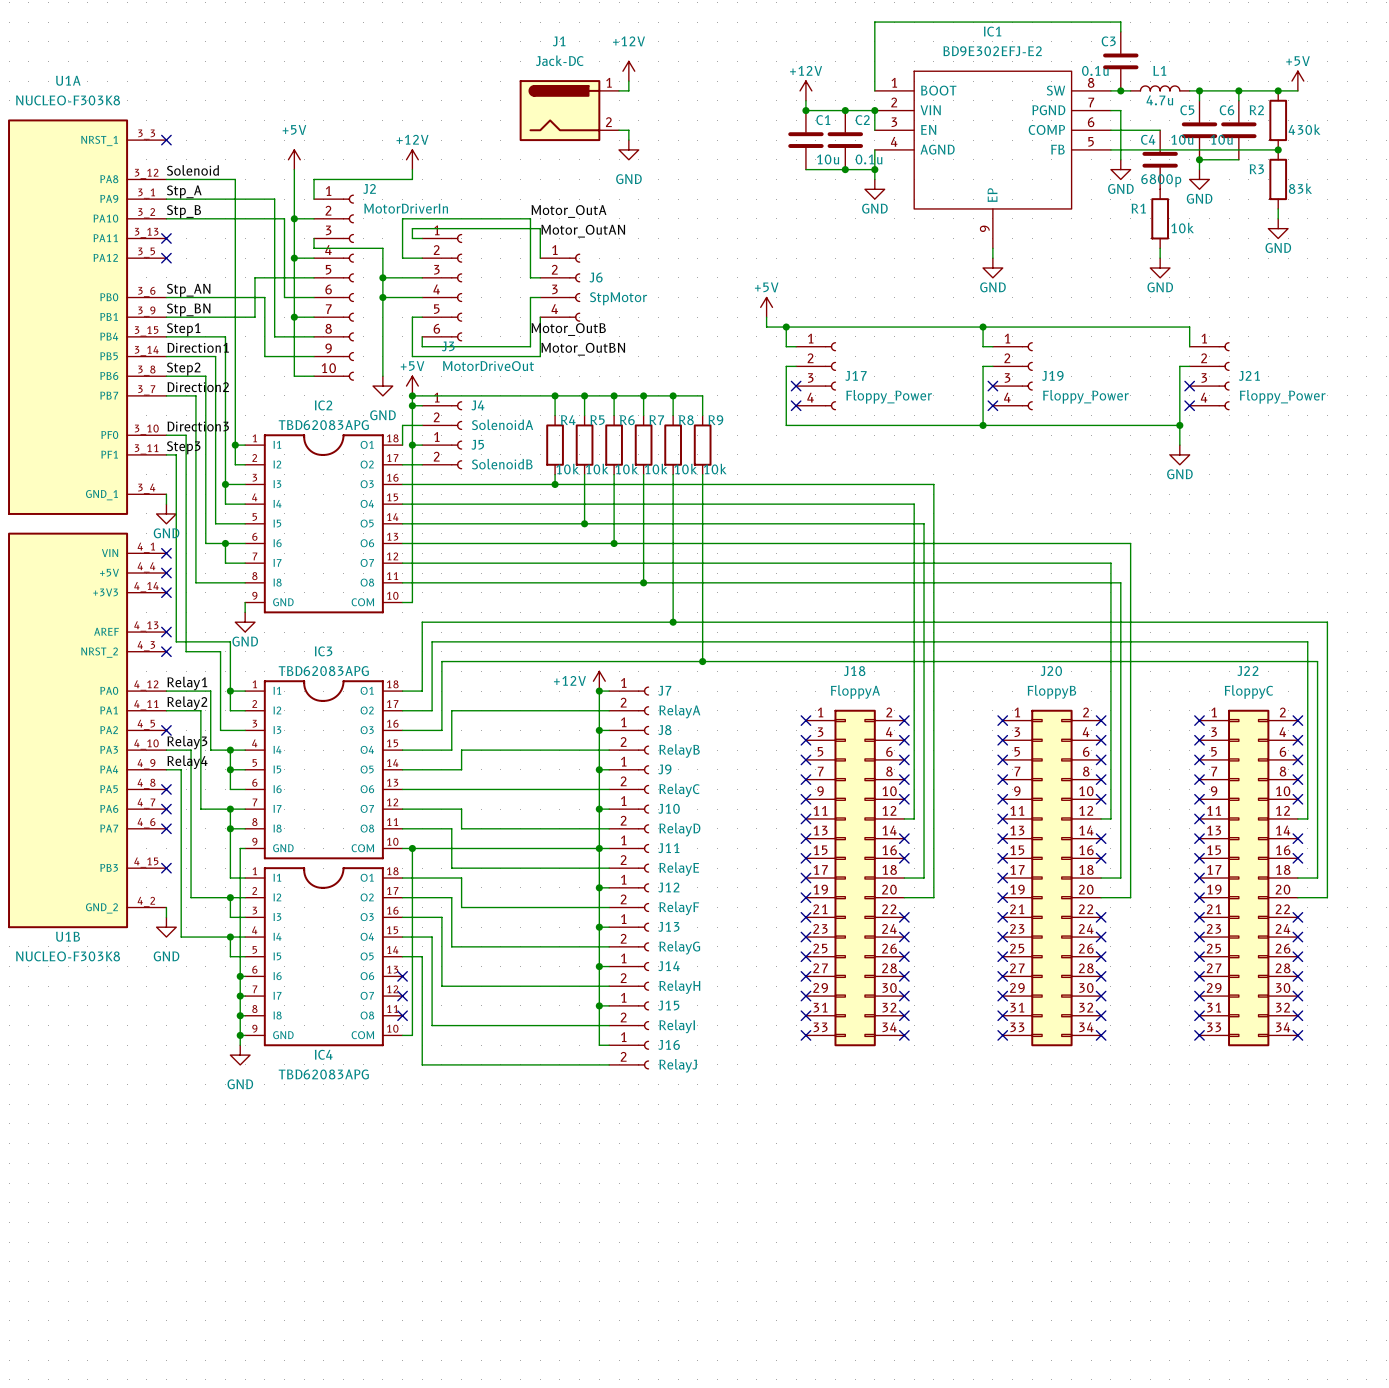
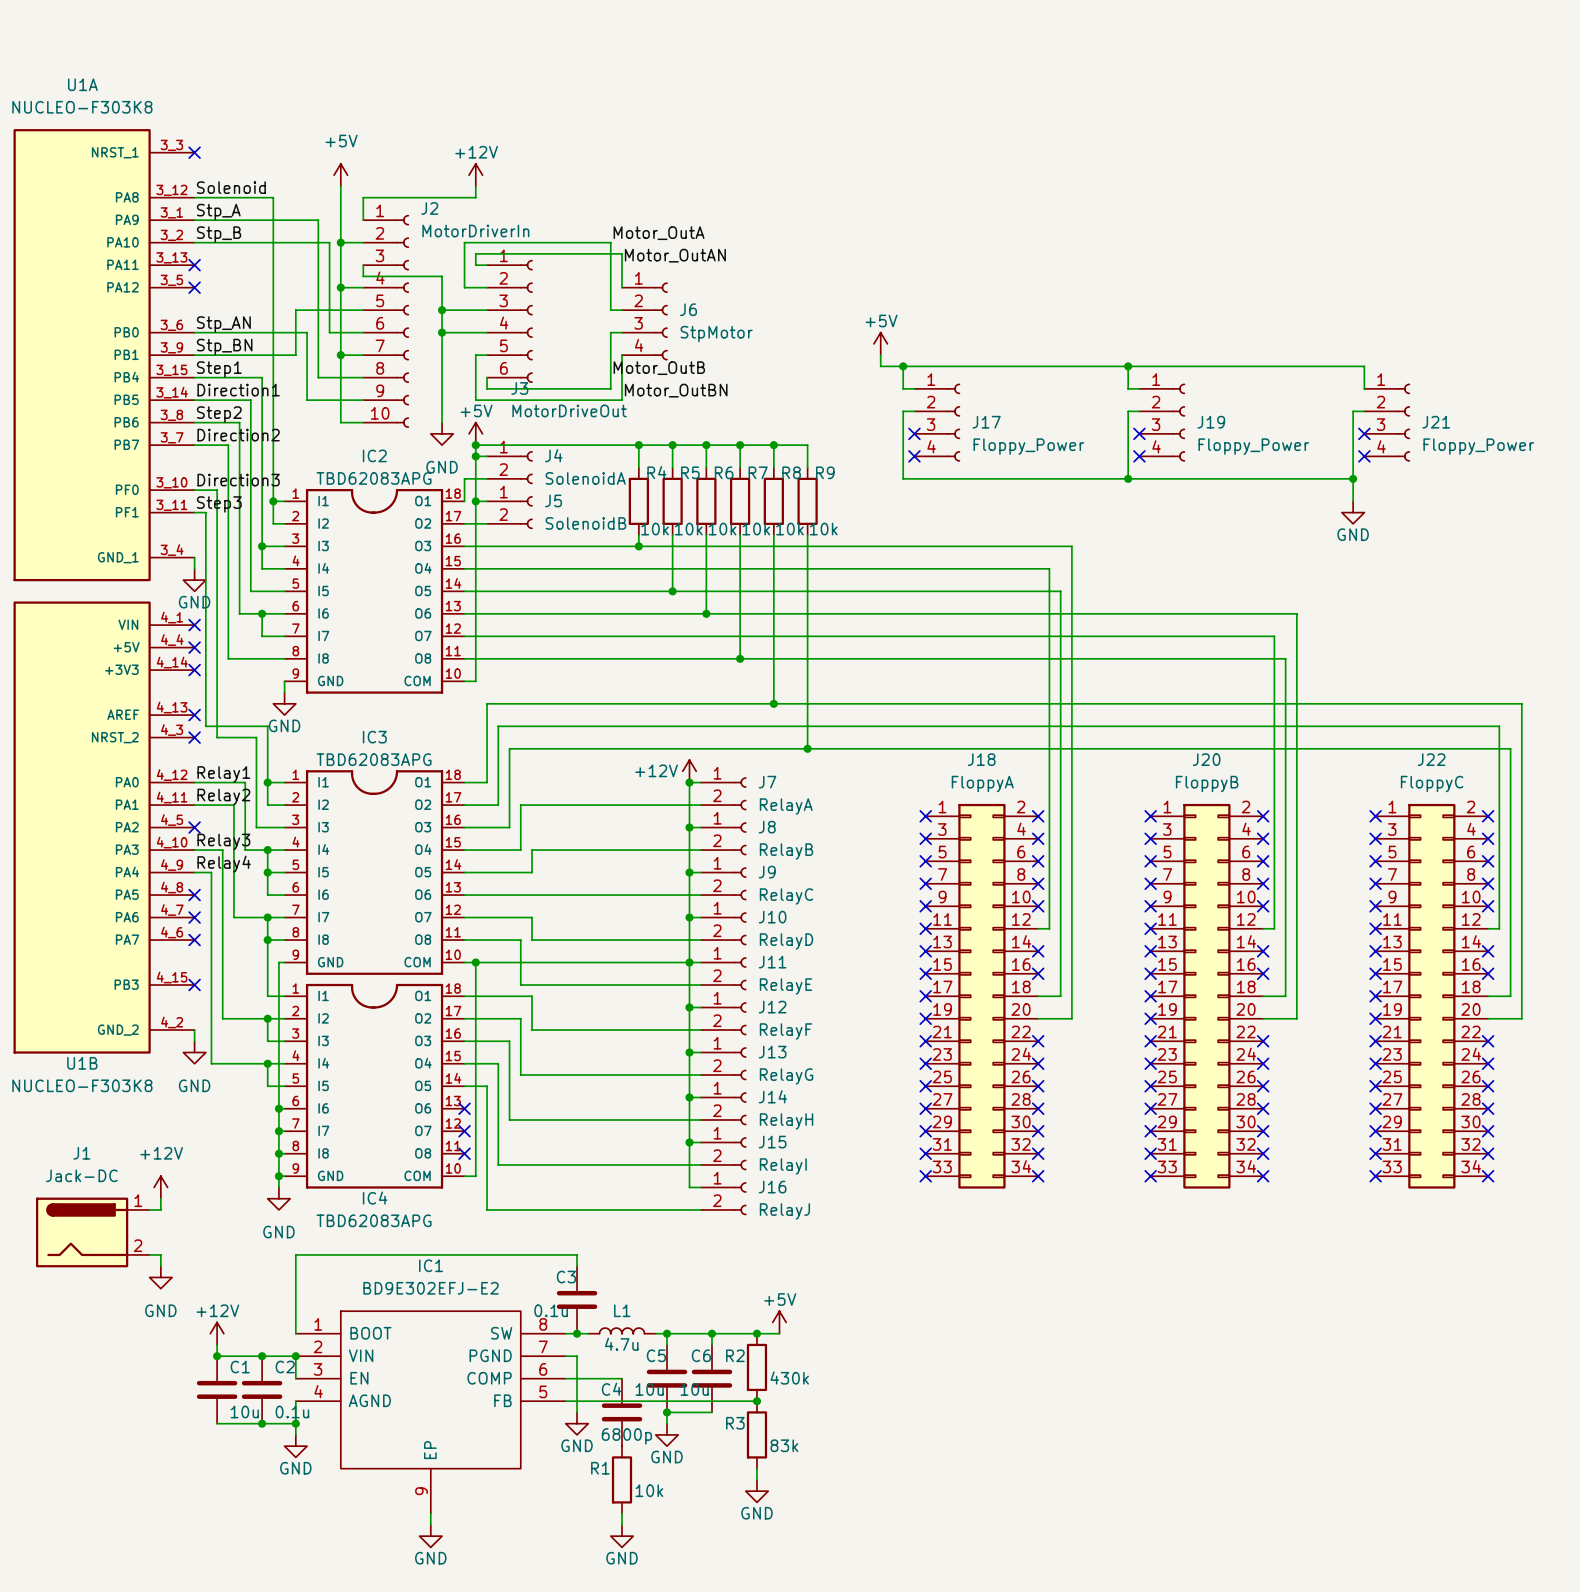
wire: (1120, 31) (1120, 22) (874, 22) (874, 90) -> none
C3 position: (1120, 61) -> (577, 1299)
power symbol: +12V (628, 71) -> none
wire: (628, 81) (628, 90) (619, 90) -> none
power symbol: +5V (1297, 81) -> none
L1 position: (1160, 88) -> (622, 1330)
power symbol: +12V (805, 90) -> none
wire: (1110, 90) (1130, 90) -> none
junction: (1120, 90) -> none
wire: (1189, 90) (1297, 90) -> none
wire: (1199, 90) (1199, 100) -> none
junction: (1199, 90) -> none
wire: (1238, 90) (1238, 100) -> none
junction: (1238, 90) -> none
junction: (1278, 90) -> none
wire: (805, 100) (805, 110) (874, 110) (874, 130) -> none
J1 position: (569, 110) -> (92, 1232)
junction: (805, 110) -> none
junction: (845, 110) -> none
junction: (874, 110) -> none
wire: (1110, 110) (1120, 110) (1120, 159) -> none
R2 position: (1278, 120) -> (756, 1367)
wire: (619, 130) (628, 130) (628, 140) -> none
wire: (1110, 130) (1160, 130) -> none
C5 position: (1199, 130) -> (667, 1378)
C6 position: (1238, 130) -> (711, 1378)
C1 position: (805, 140) -> (217, 1389)
C2 position: (845, 140) -> (262, 1389)
power symbol: GND (628, 149) -> none
wire: (874, 149) (874, 179) -> none
wire: (1110, 149) (1278, 149) -> none
junction: (1278, 149) -> none
IC1 position: (992, 159) -> (430, 1412)
C4 position: (1160, 159) -> (622, 1412)
junction: (1199, 159) -> none
wire: (1238, 159) (1199, 159) (1199, 169) -> none
wire: (805, 169) (874, 169) -> none
junction: (845, 169) -> none
junction: (874, 169) -> none
power symbol: GND (1120, 169) -> none
power symbol: GND (1199, 179) -> none
R3 position: (1278, 179) -> (756, 1434)
power symbol: GND (874, 189) -> none
wire: (1278, 208) (1278, 218) -> none
R1 position: (1160, 218) -> (622, 1479)
power symbol: GND (1278, 228) -> none
wire: (992, 248) (992, 258) -> none
wire: (1160, 248) (1160, 258) -> none
power symbol: GND (992, 268) -> none
power symbol: GND (1160, 268) -> none
power symbol: none -> +12V (160, 1187)
wire: none -> (160, 1198) (160, 1209) (149, 1209)
wire: none -> (149, 1254) (160, 1254) (160, 1266)
wire: none -> (577, 1266) (577, 1254) (295, 1254) (295, 1333)
power symbol: none -> GND (160, 1277)
power symbol: none -> +5V (779, 1322)
power symbol: none -> +12V (217, 1333)
wire: none -> (565, 1333) (588, 1333)
junction: none -> (577, 1333)
wire: none -> (655, 1333) (779, 1333)
wire: none -> (667, 1333) (667, 1344)
junction: none -> (667, 1333)
wire: none -> (711, 1333) (711, 1344)
junction: none -> (711, 1333)
junction: none -> (756, 1333)
wire: none -> (217, 1344) (217, 1356) (295, 1356) (295, 1378)
junction: none -> (217, 1356)
junction: none -> (262, 1356)
junction: none -> (295, 1356)
wire: none -> (565, 1356) (577, 1356) (577, 1412)
wire: none -> (565, 1378) (622, 1378)
wire: none -> (295, 1401) (295, 1434)
wire: none -> (565, 1401) (756, 1401)
junction: none -> (756, 1401)
junction: none -> (667, 1412)
wire: none -> (711, 1412) (667, 1412) (667, 1423)
wire: none -> (217, 1423) (295, 1423)
junction: none -> (262, 1423)
junction: none -> (295, 1423)
power symbol: none -> GND (577, 1423)
power symbol: none -> GND (667, 1434)
power symbol: none -> GND (295, 1446)
wire: none -> (756, 1468) (756, 1479)
power symbol: none -> GND (756, 1491)
wire: none -> (430, 1513) (430, 1524)
wire: none -> (622, 1513) (622, 1524)
power symbol: none -> GND (430, 1536)
power symbol: none -> GND (622, 1536)

